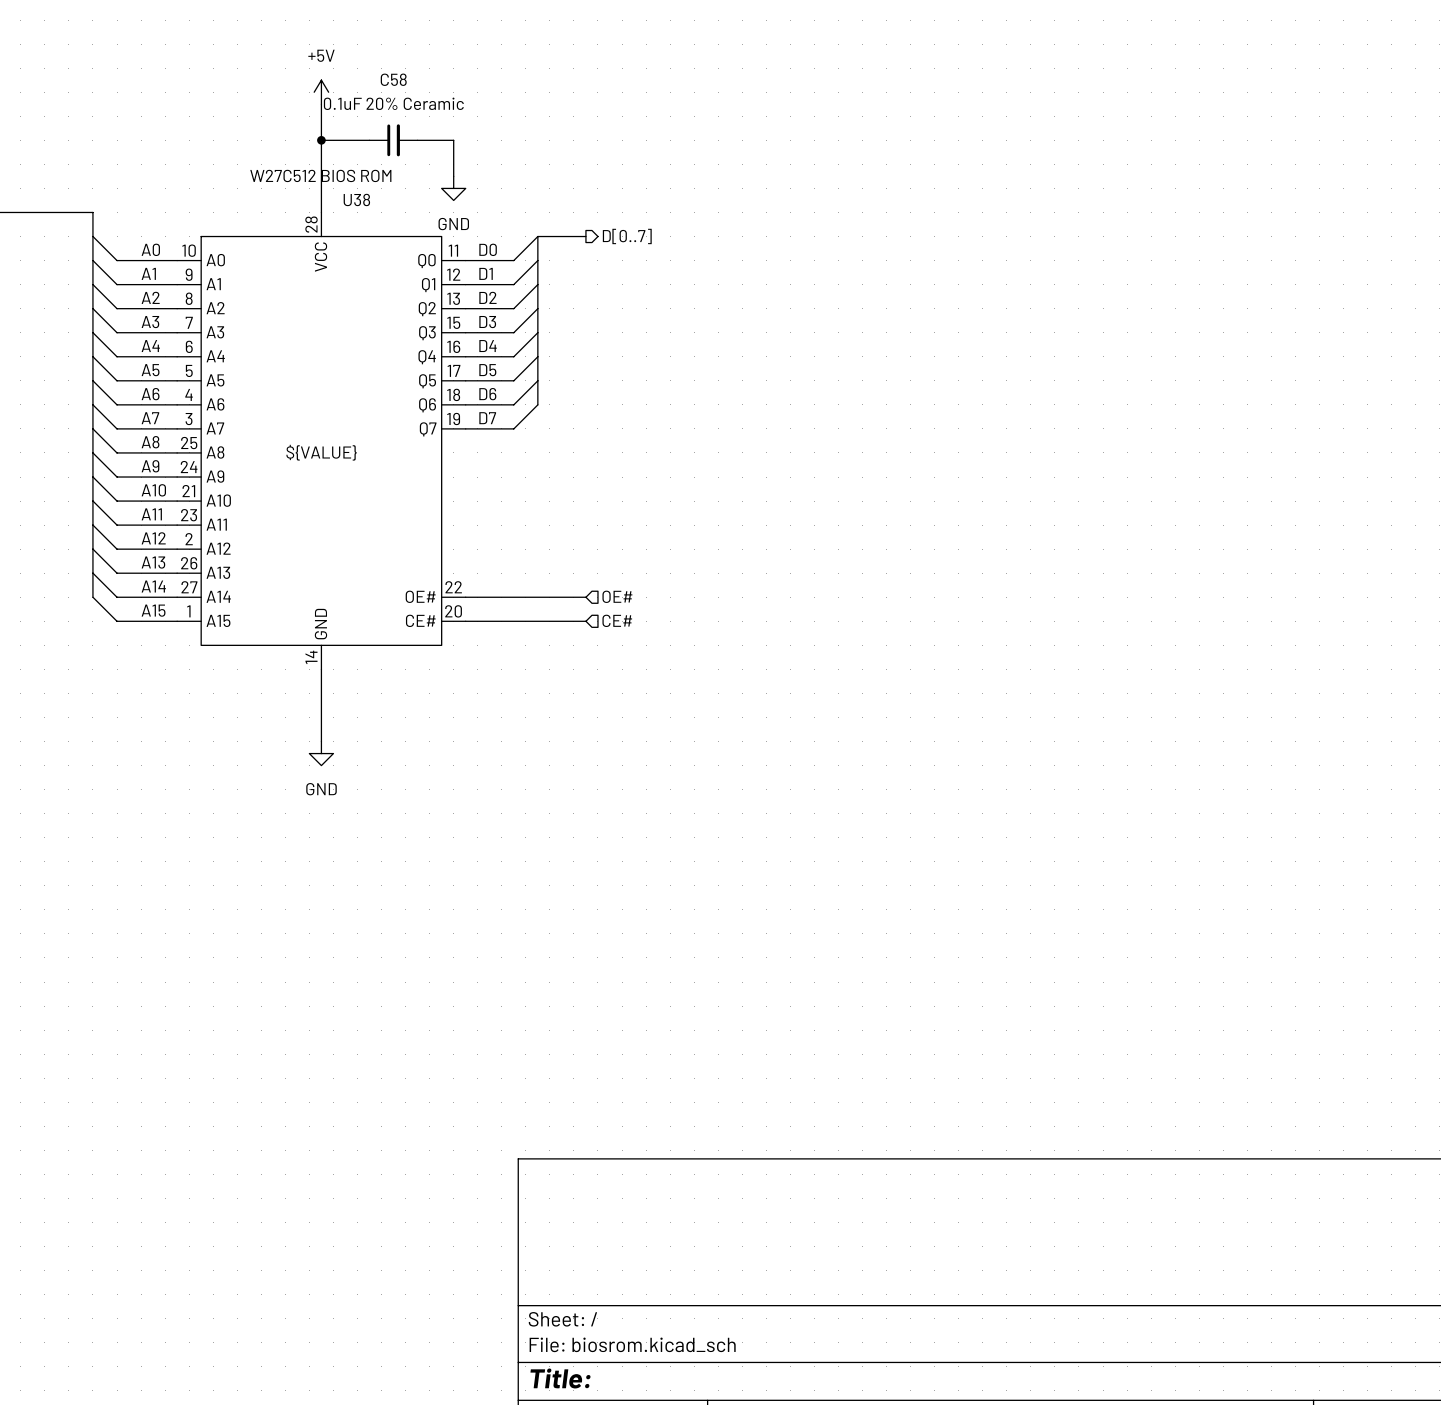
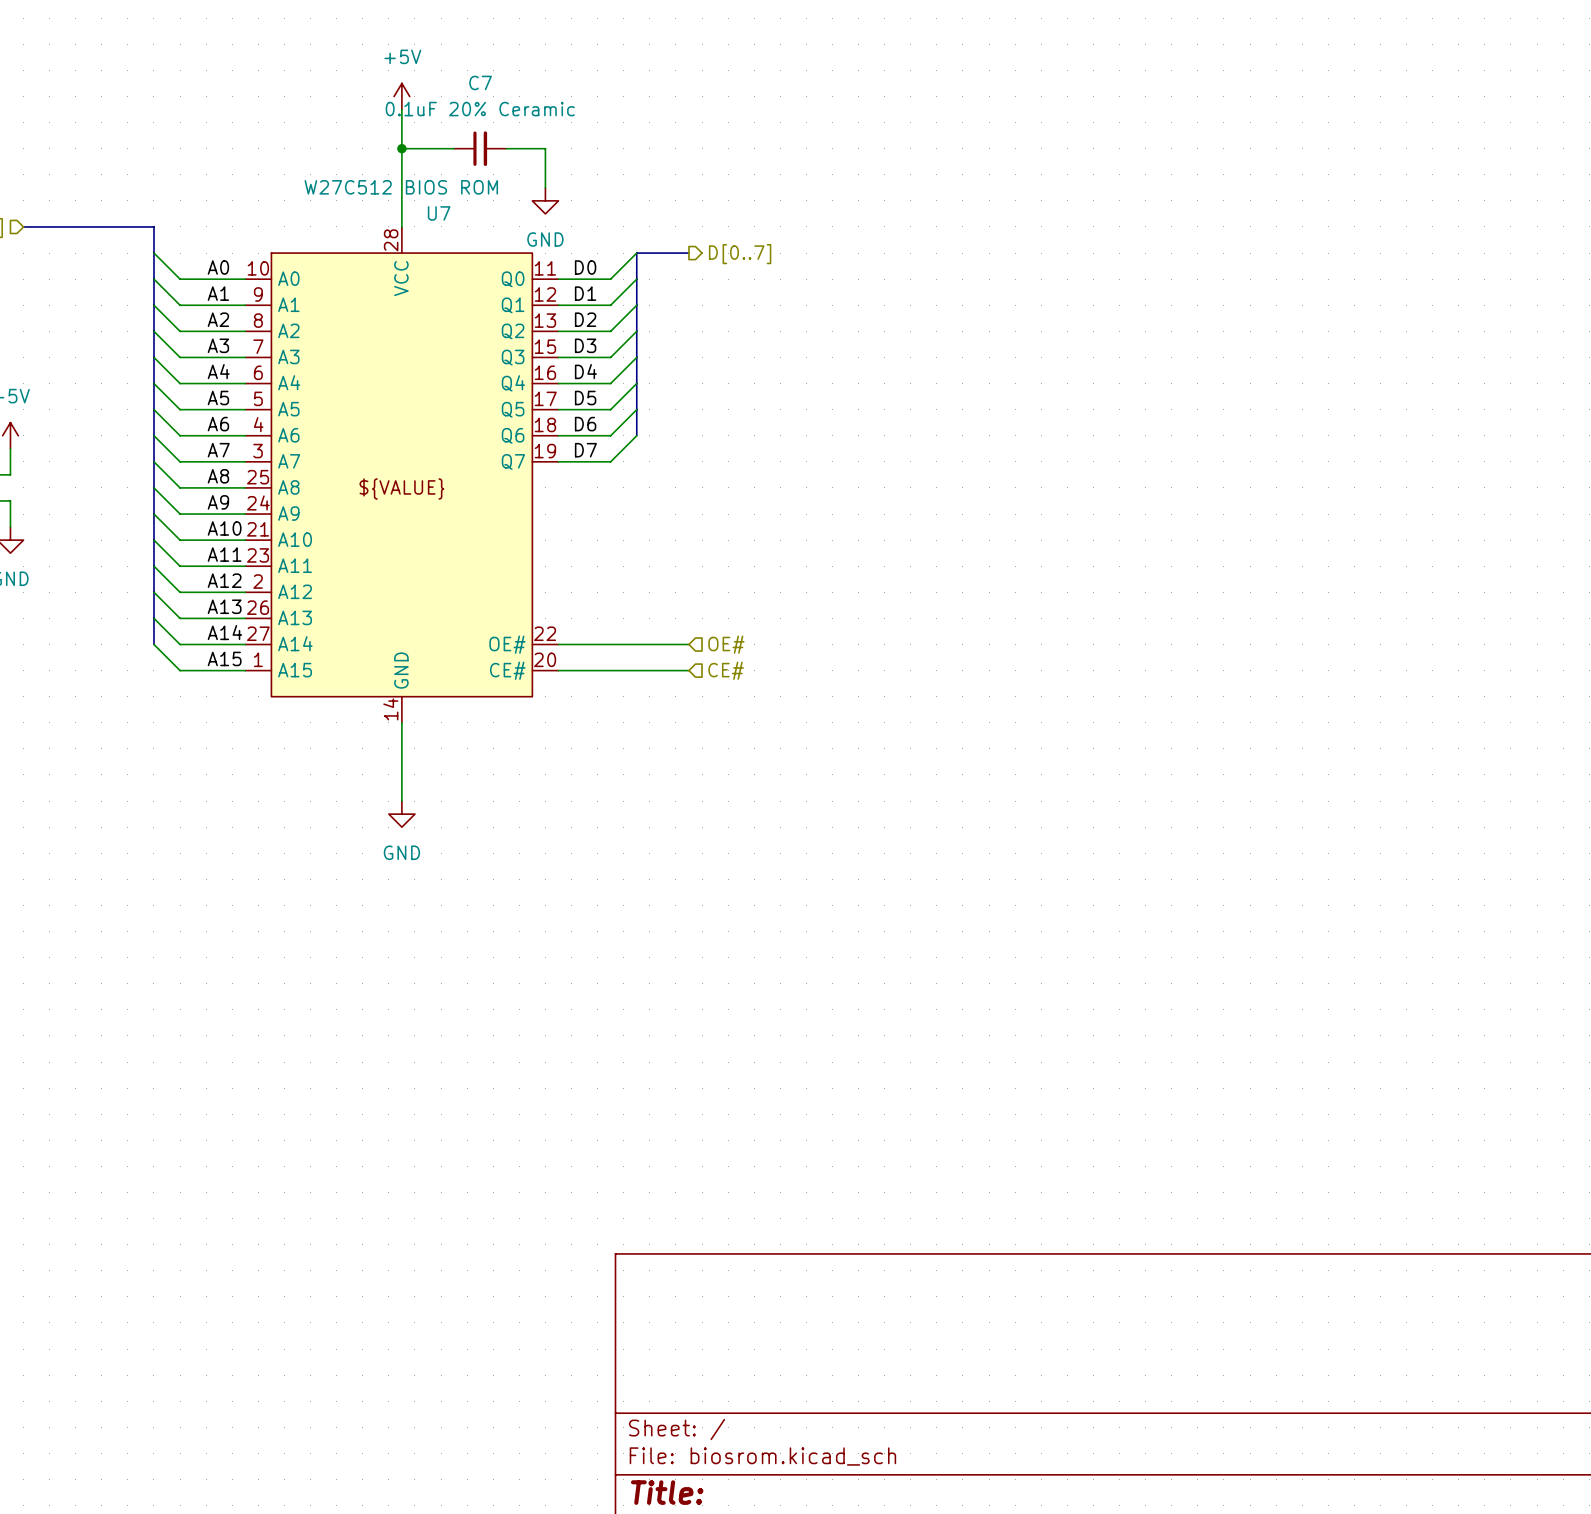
C58 name: C58 (393, 79) -> C7 (480, 82)
U38 name: U38 (356, 199) -> U7 (439, 213)

